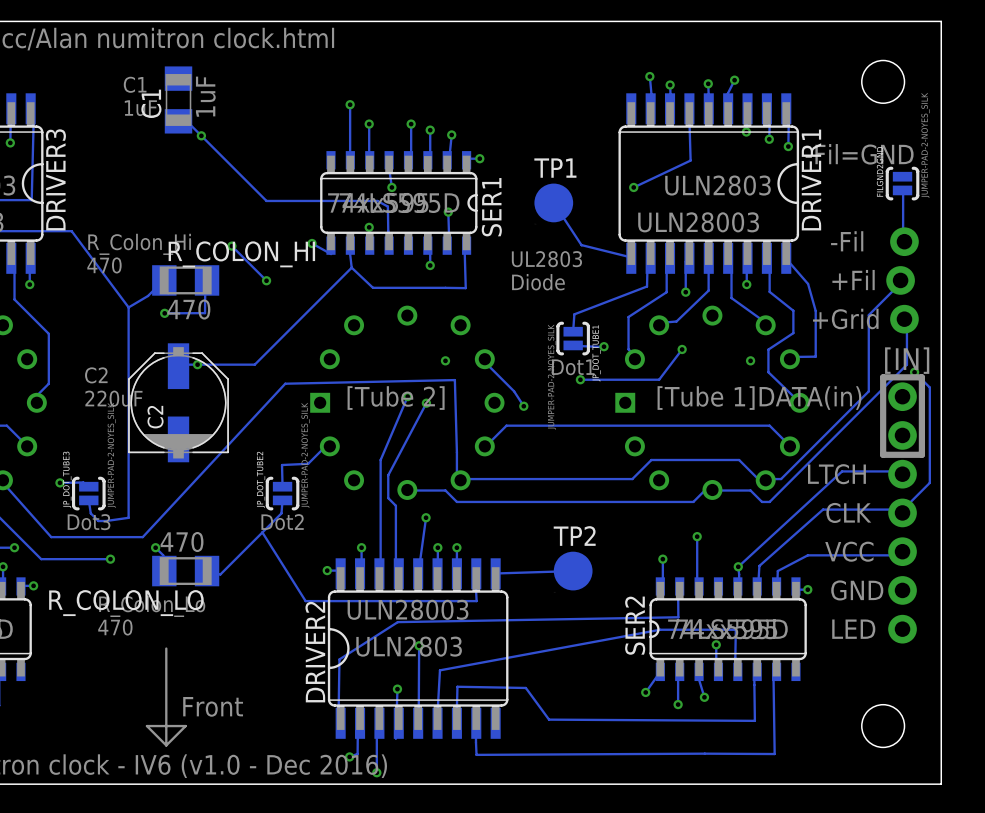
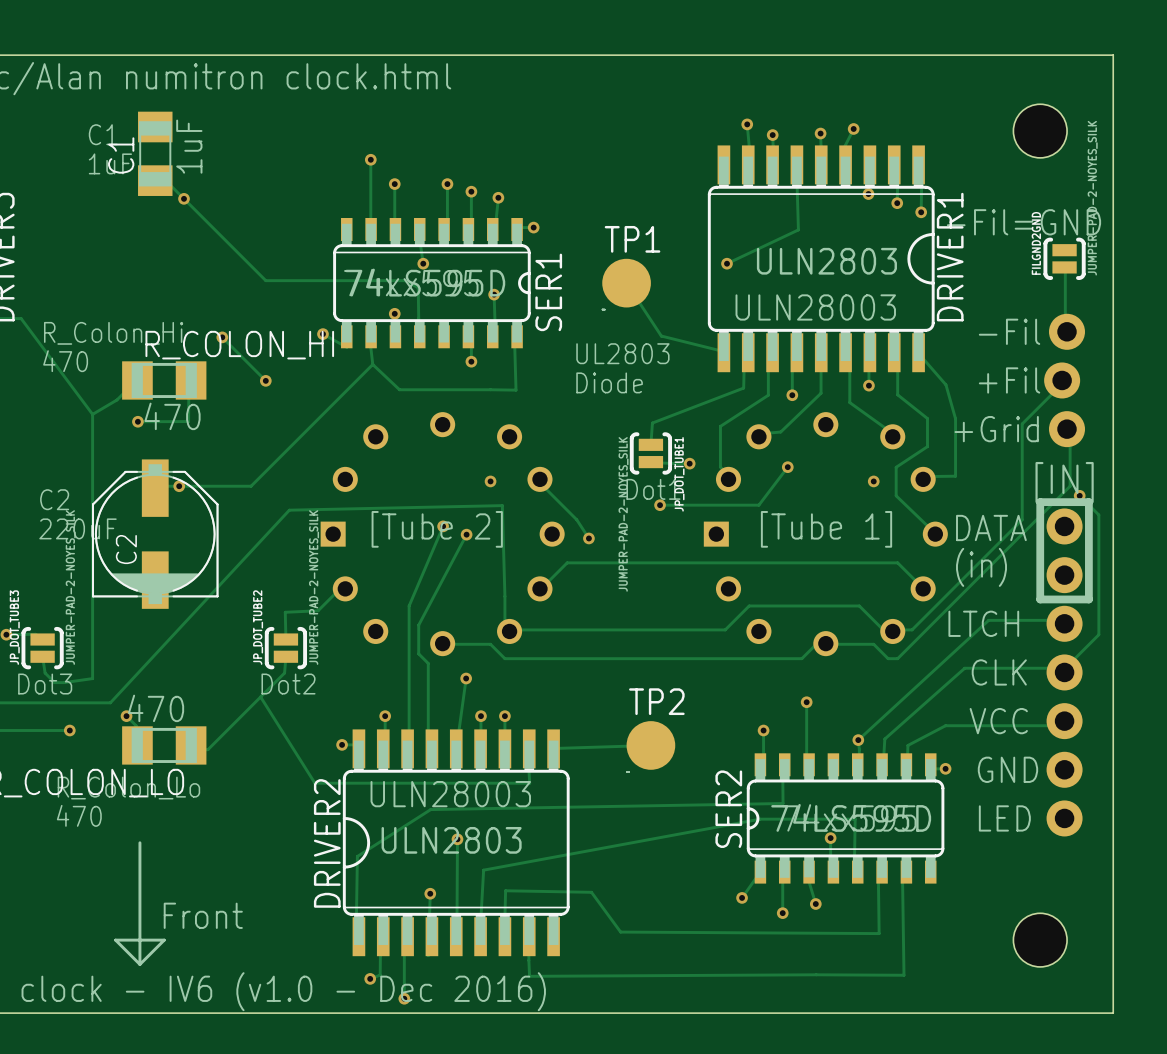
text: none -> DATA (991, 527)
text: DATA(in) (810, 398) -> none
text: none -> (in) (981, 567)

